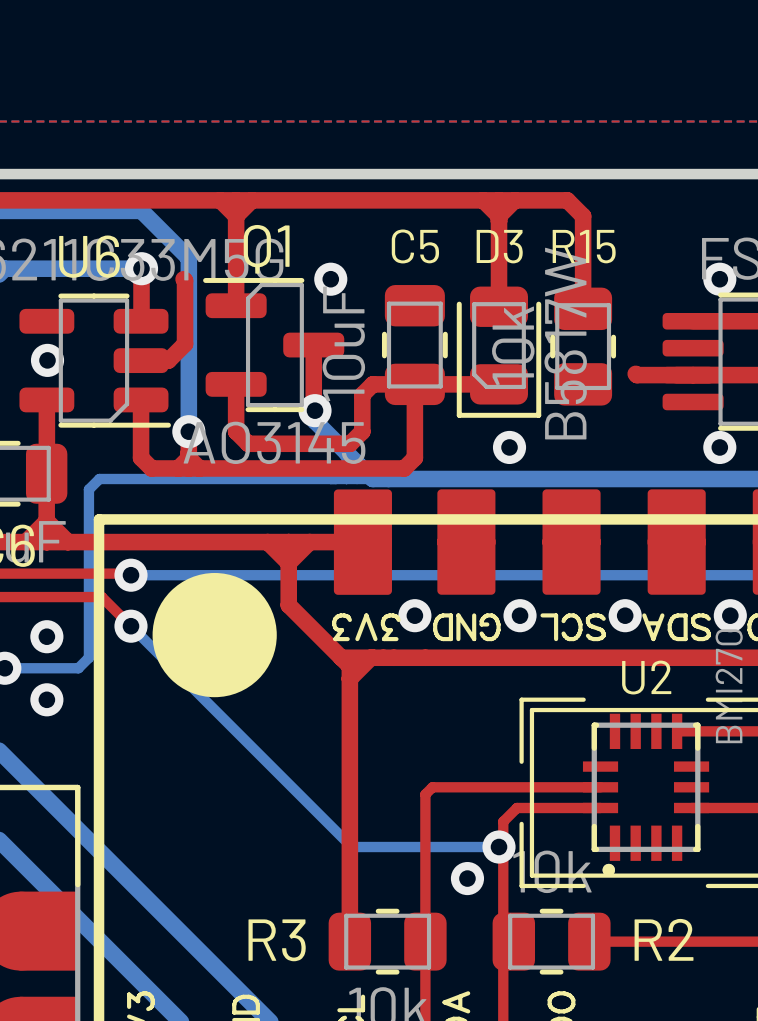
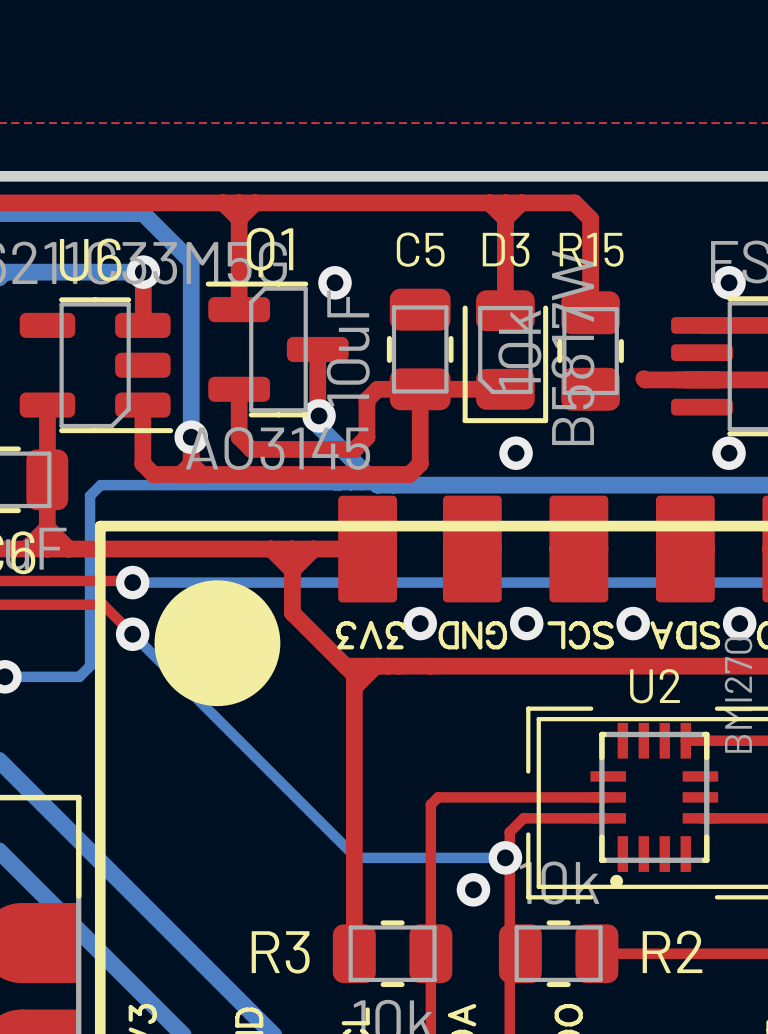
top track: (183, 279) (185, 344) (168, 360) (141, 360) -> none
via: (47, 360) -> none
via: (46, 636) -> none
via: (46, 699) -> none

